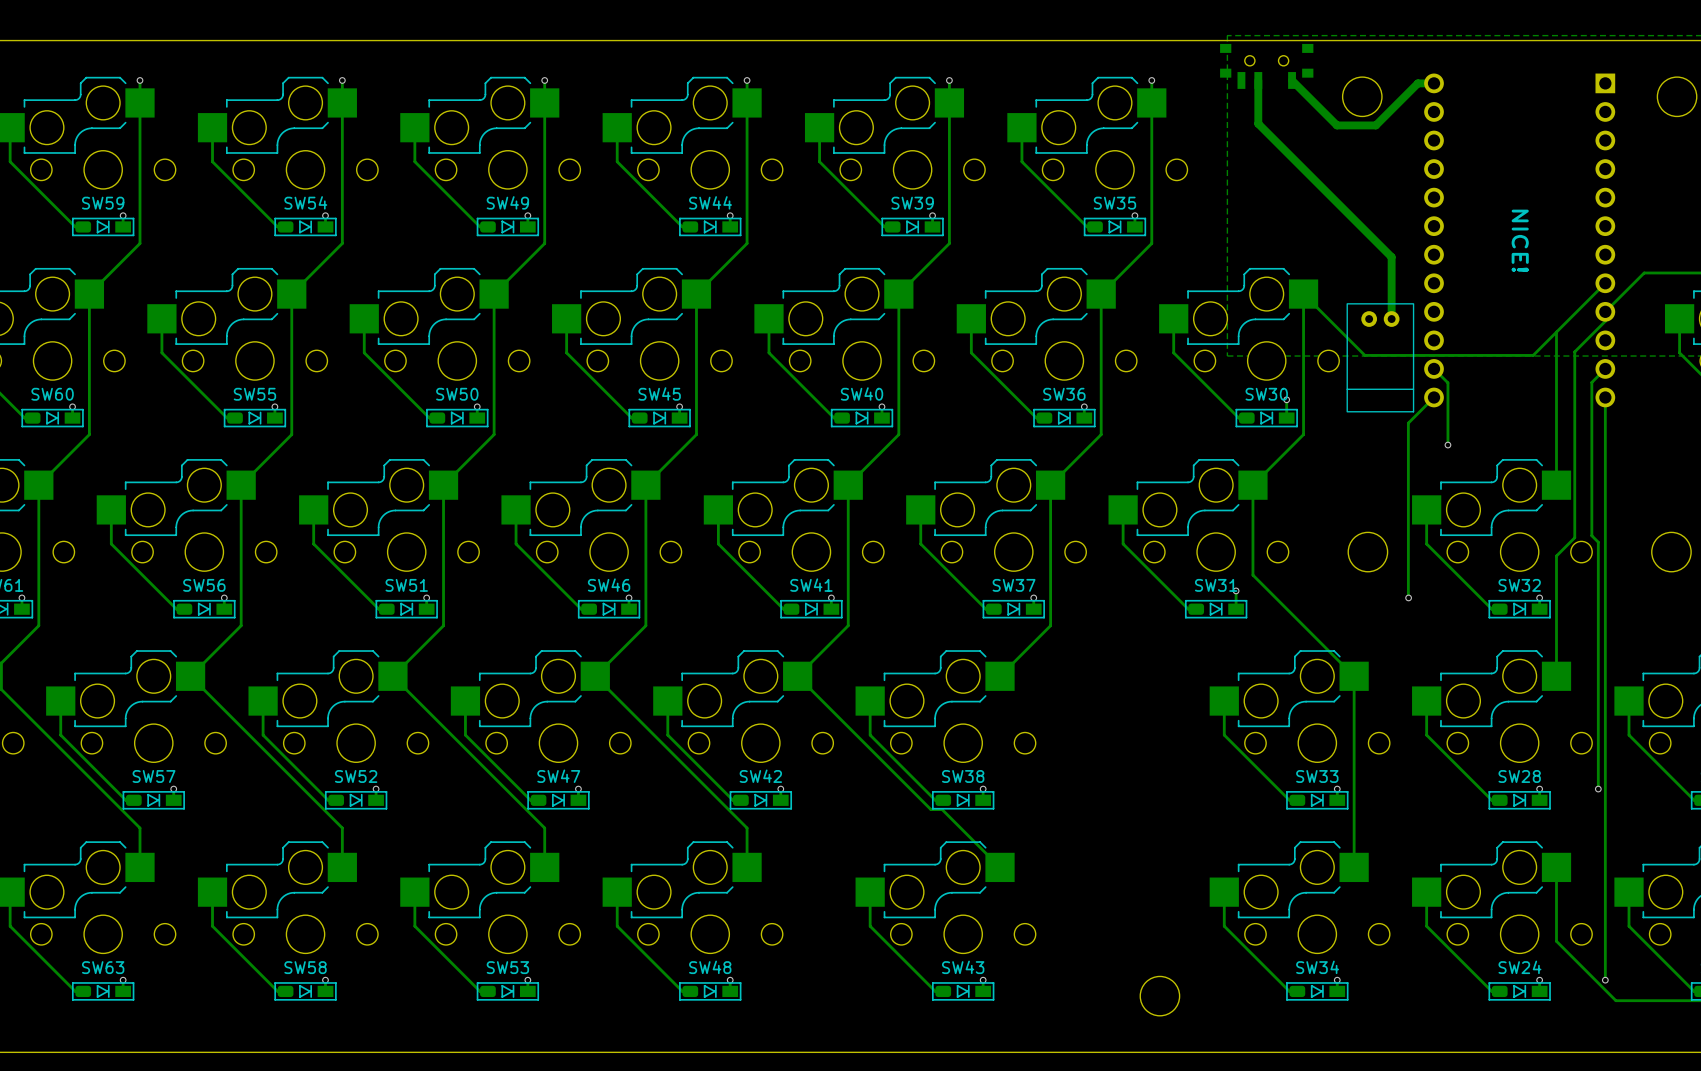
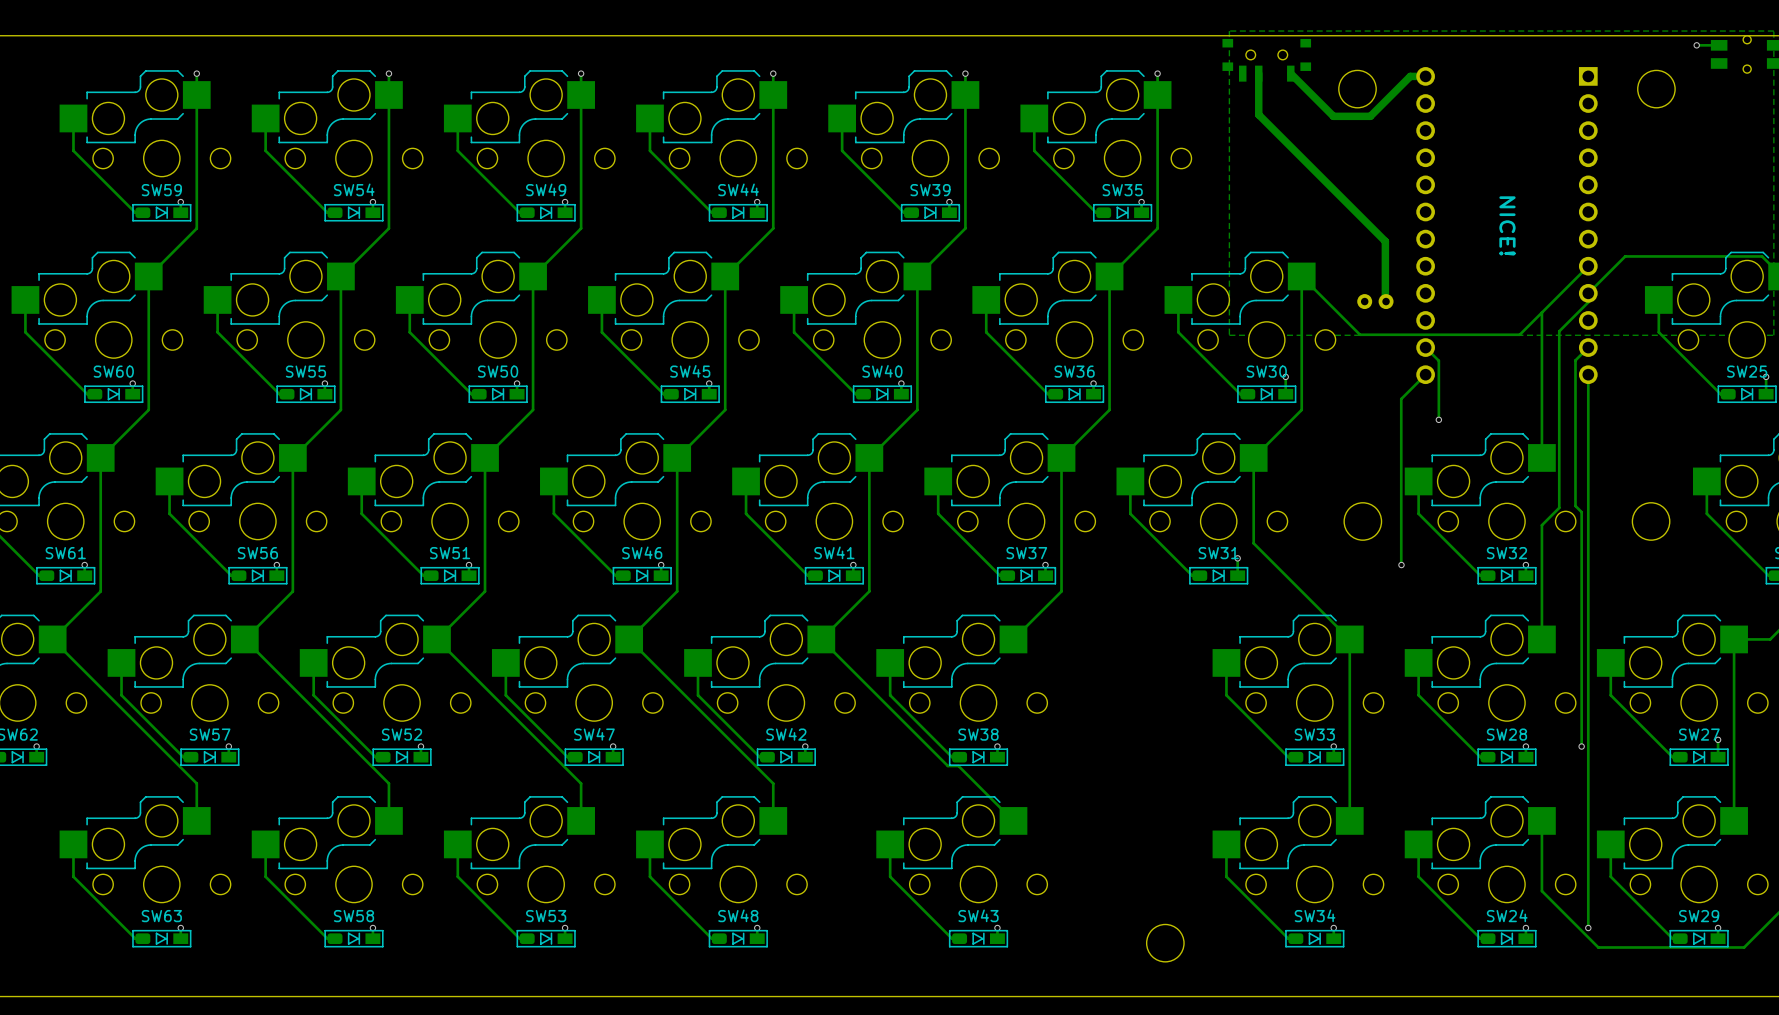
part side: bottom (1380, 357) -> top (1375, 301)

